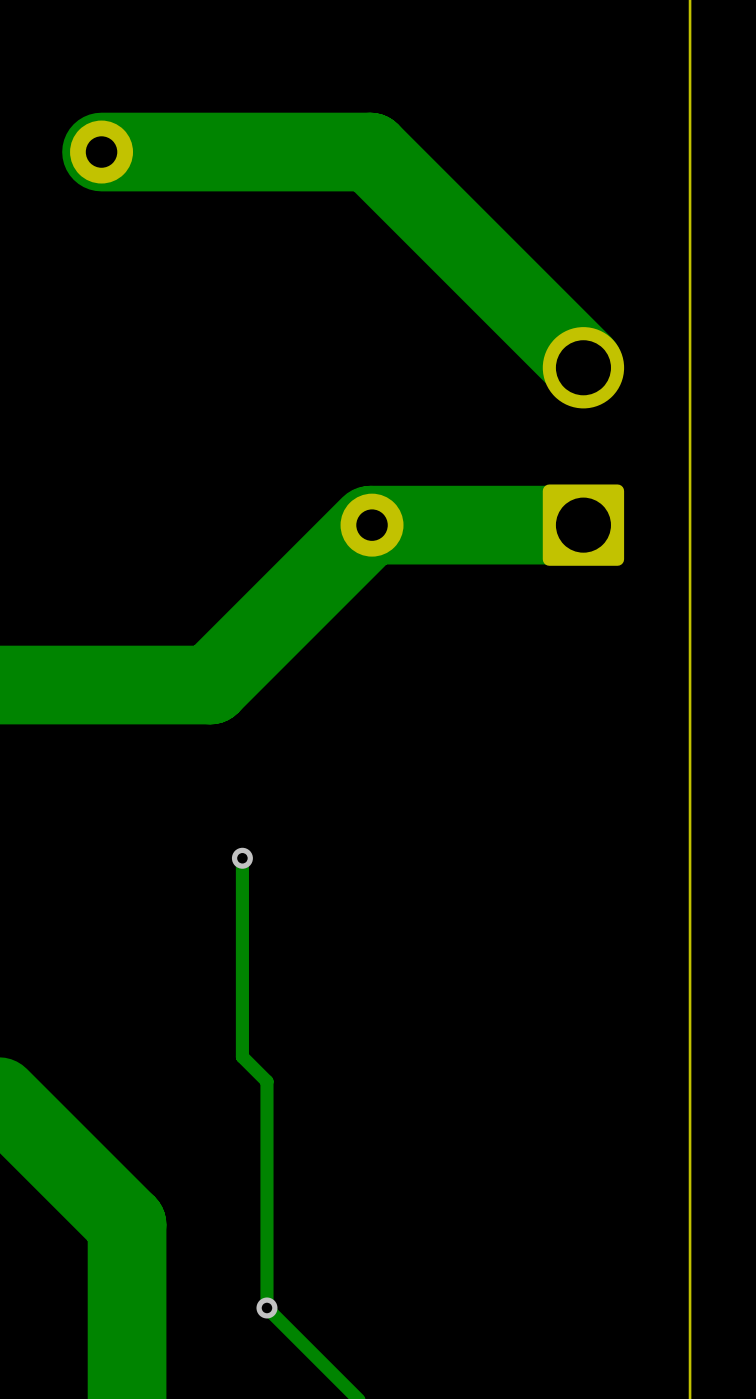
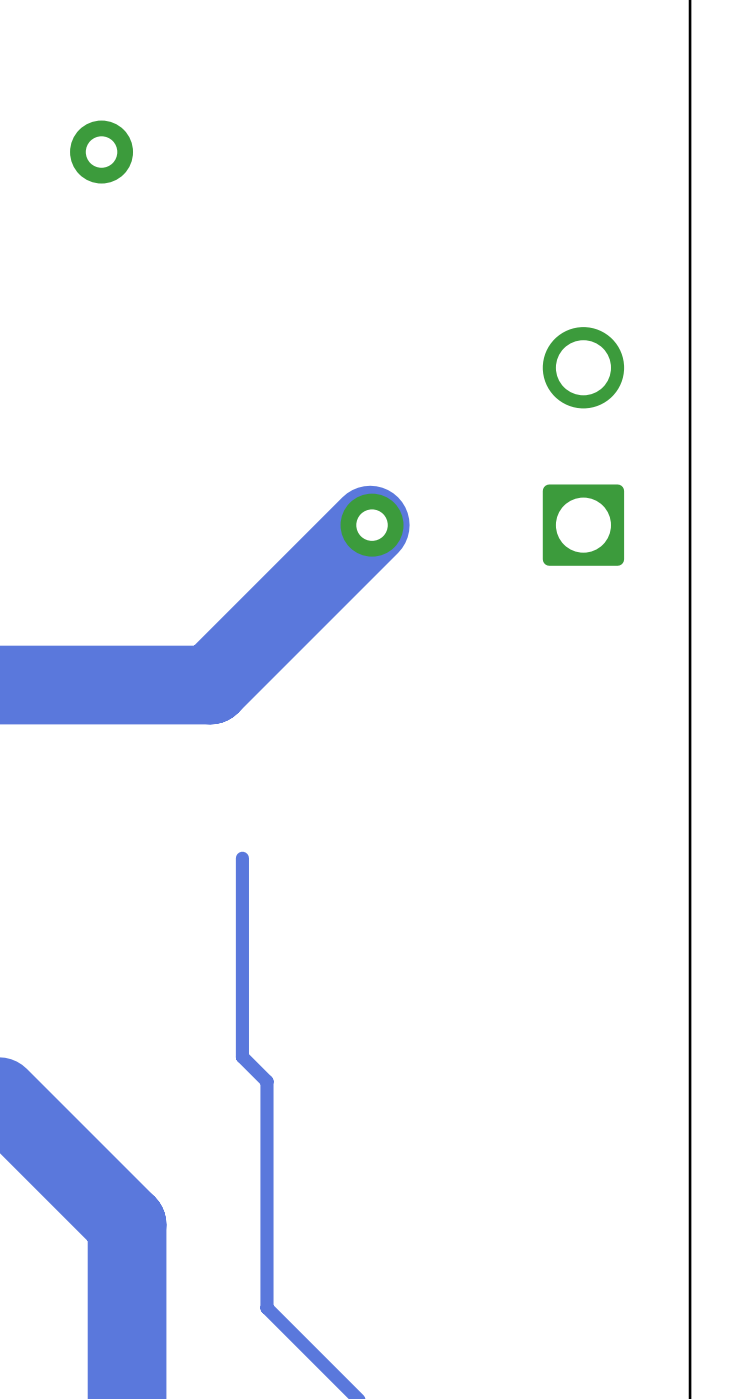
track: (101, 152) (370, 152) (583, 365) -> none
track: (583, 525) (372, 525) -> none
via: (242, 858) -> none
via: (266, 1307) -> none

